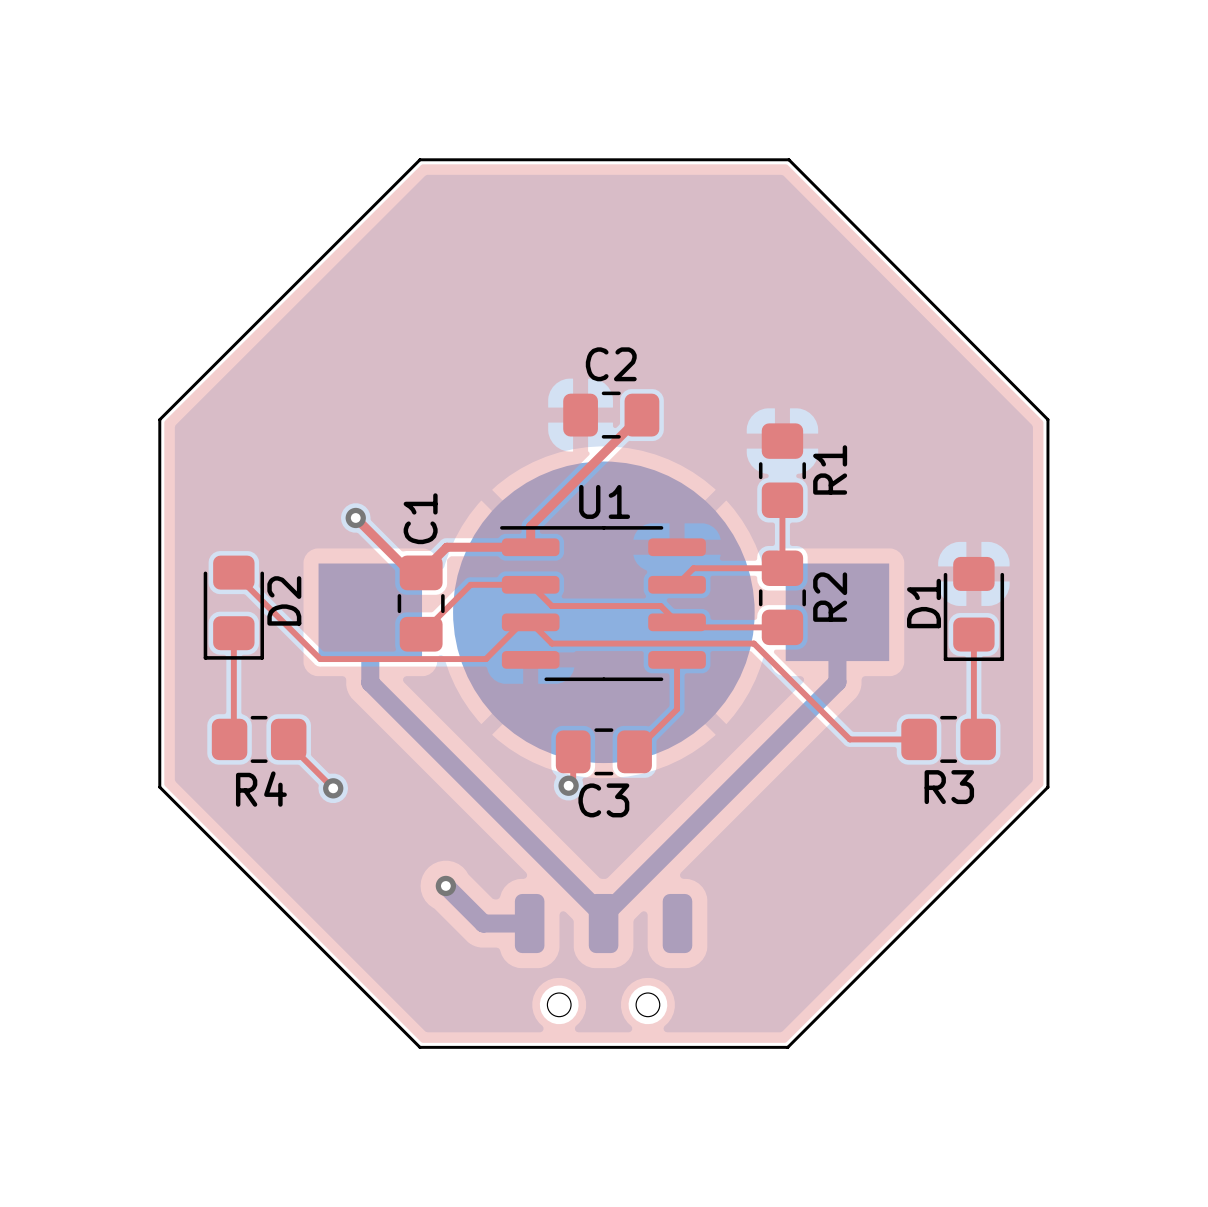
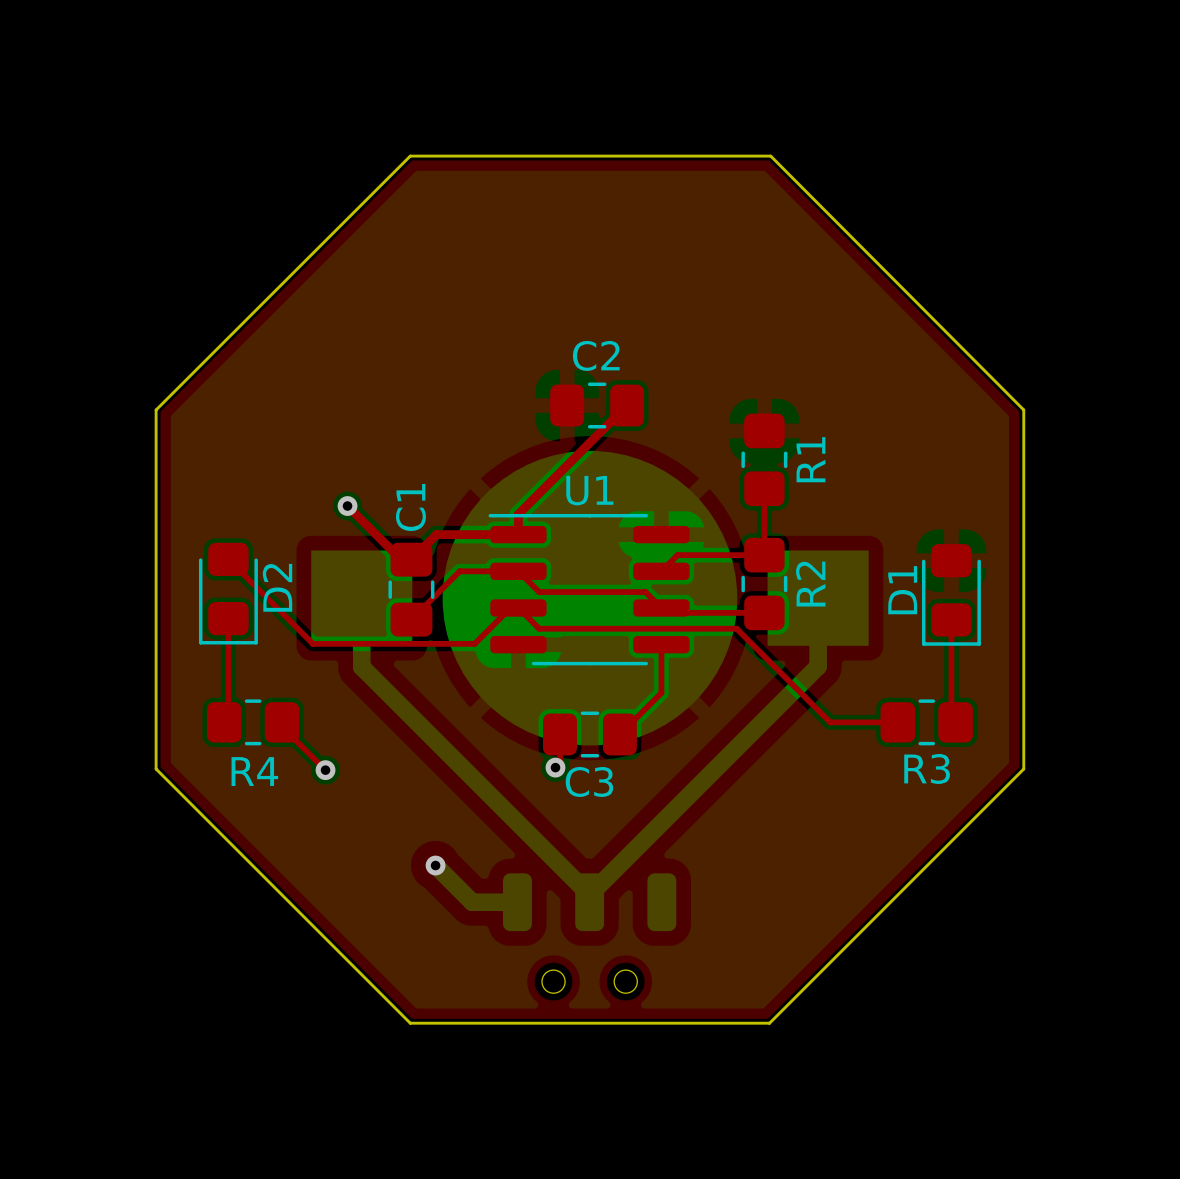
part footprint: [514, 893, 693, 1017] -> [502, 873, 677, 994]

